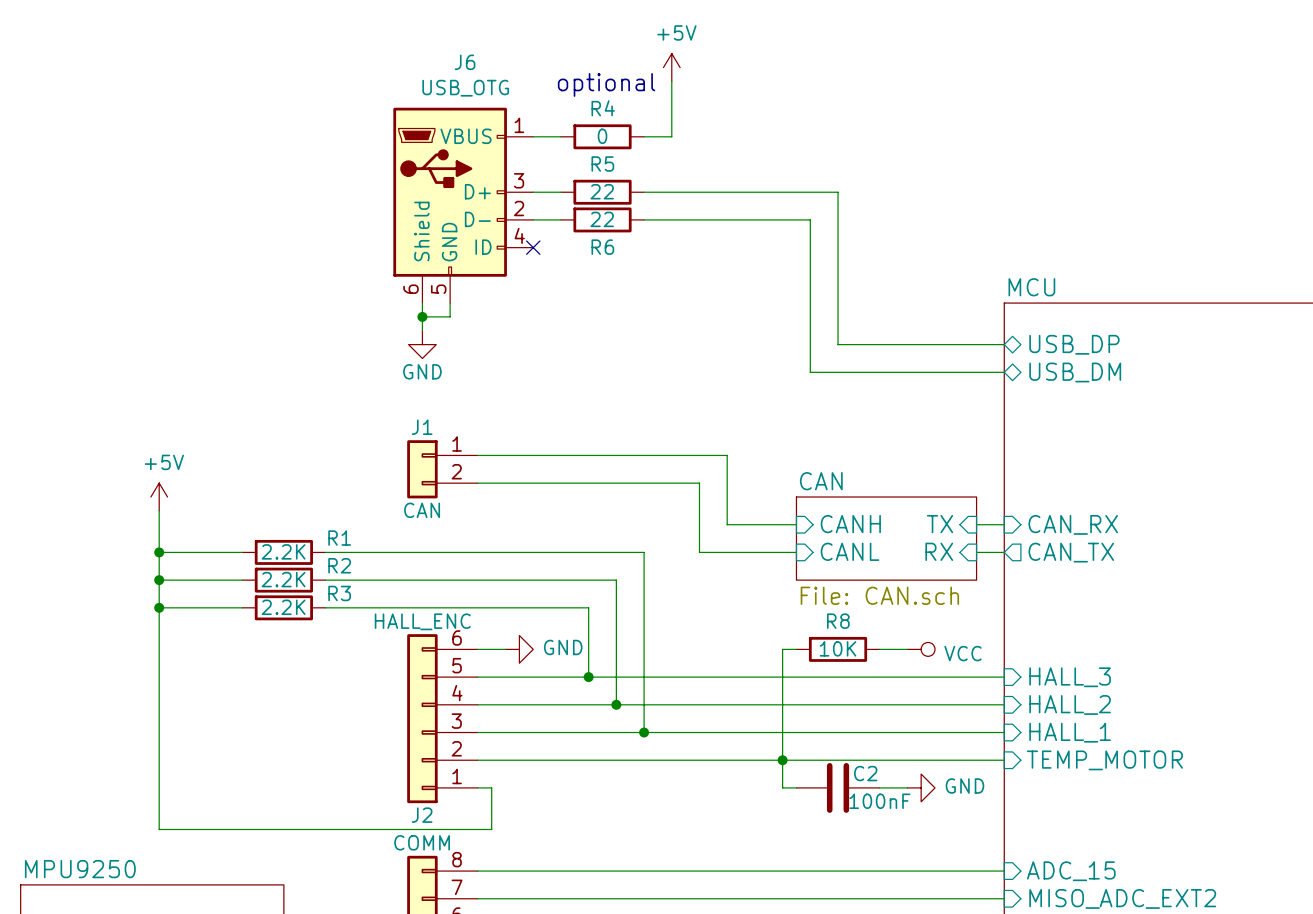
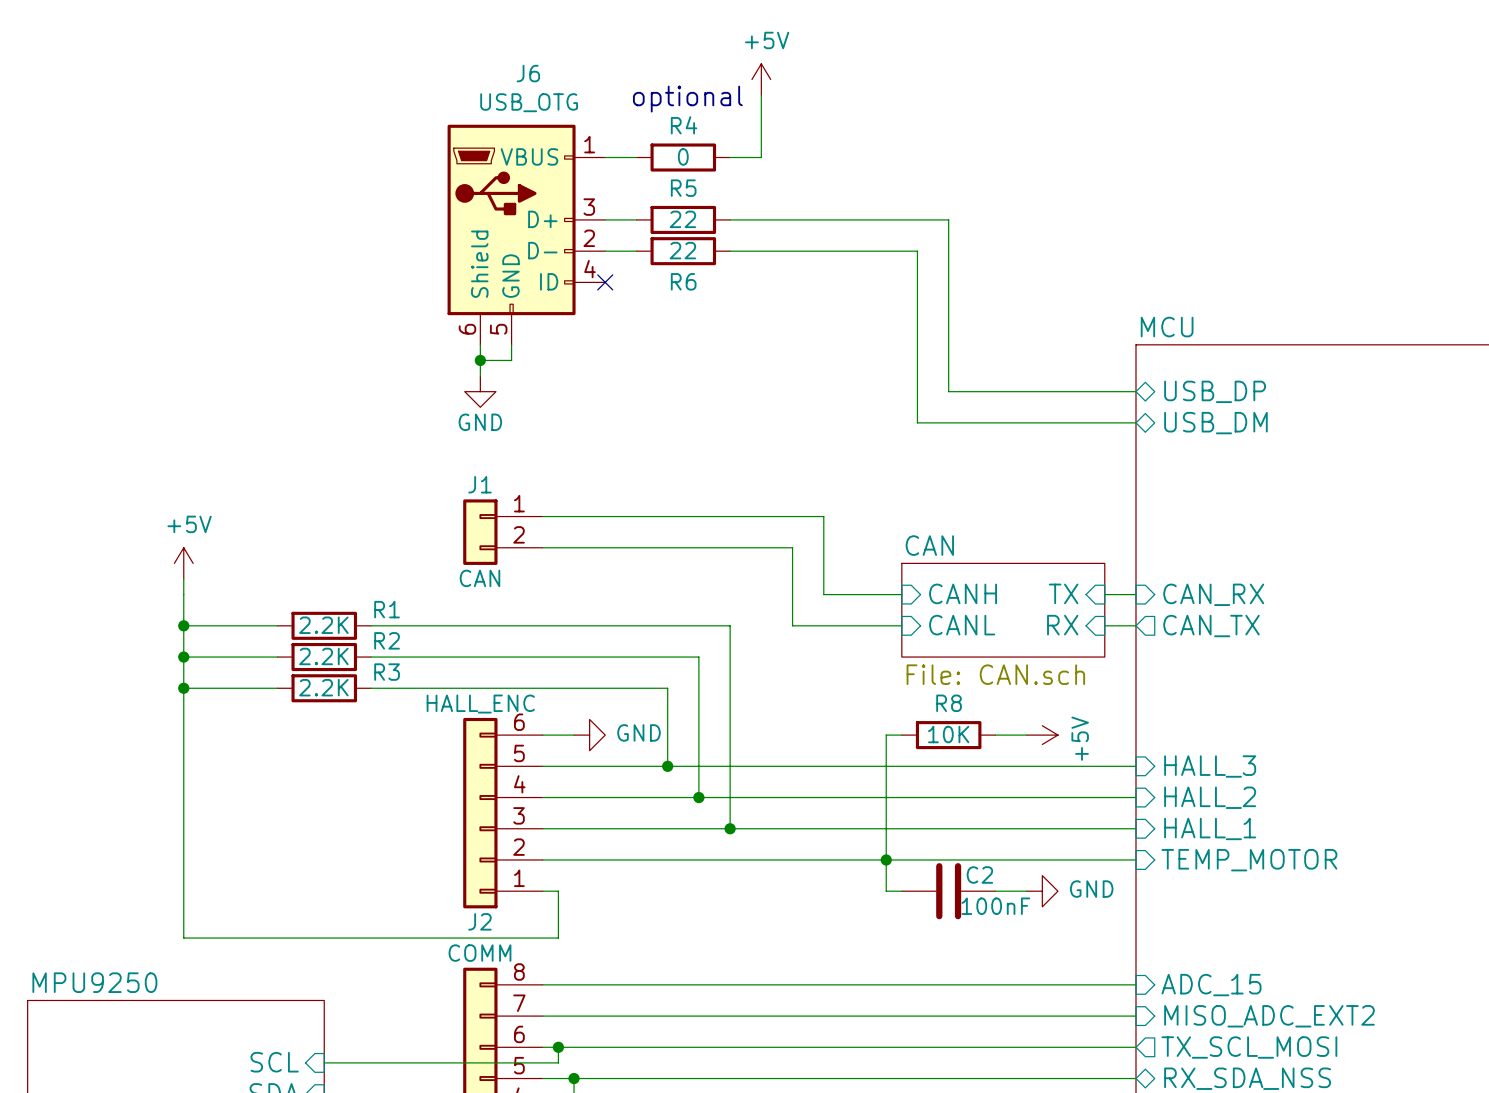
power symbol: VCC (921, 649) -> +5V (1042, 735)

